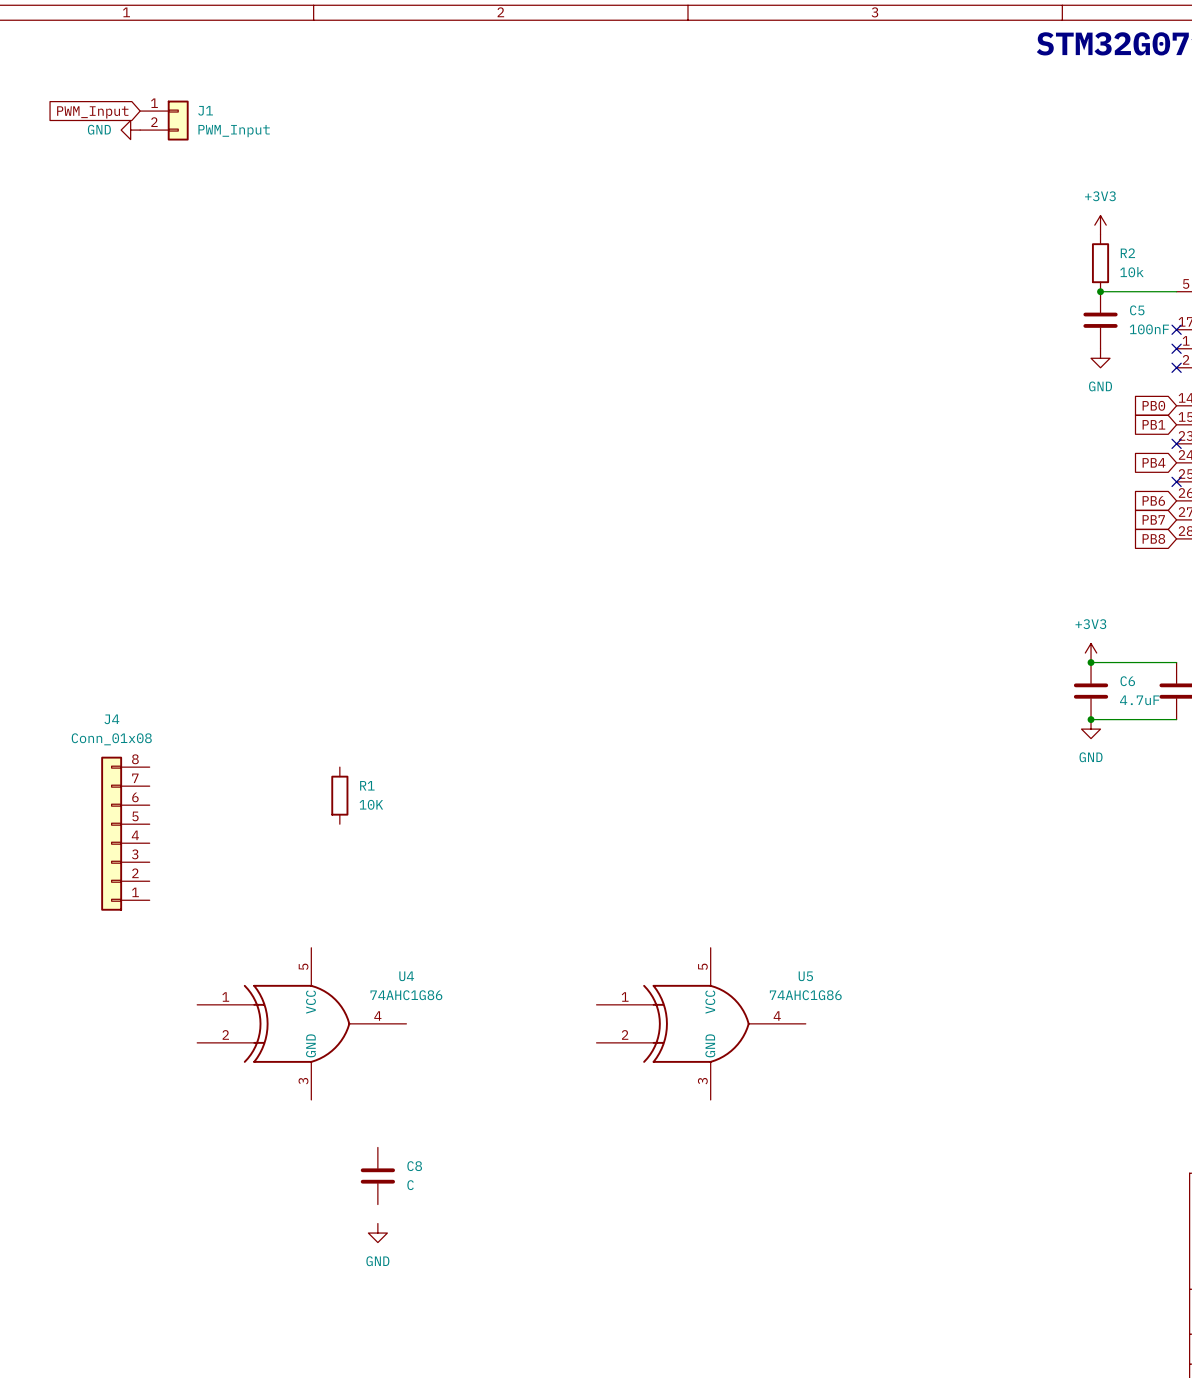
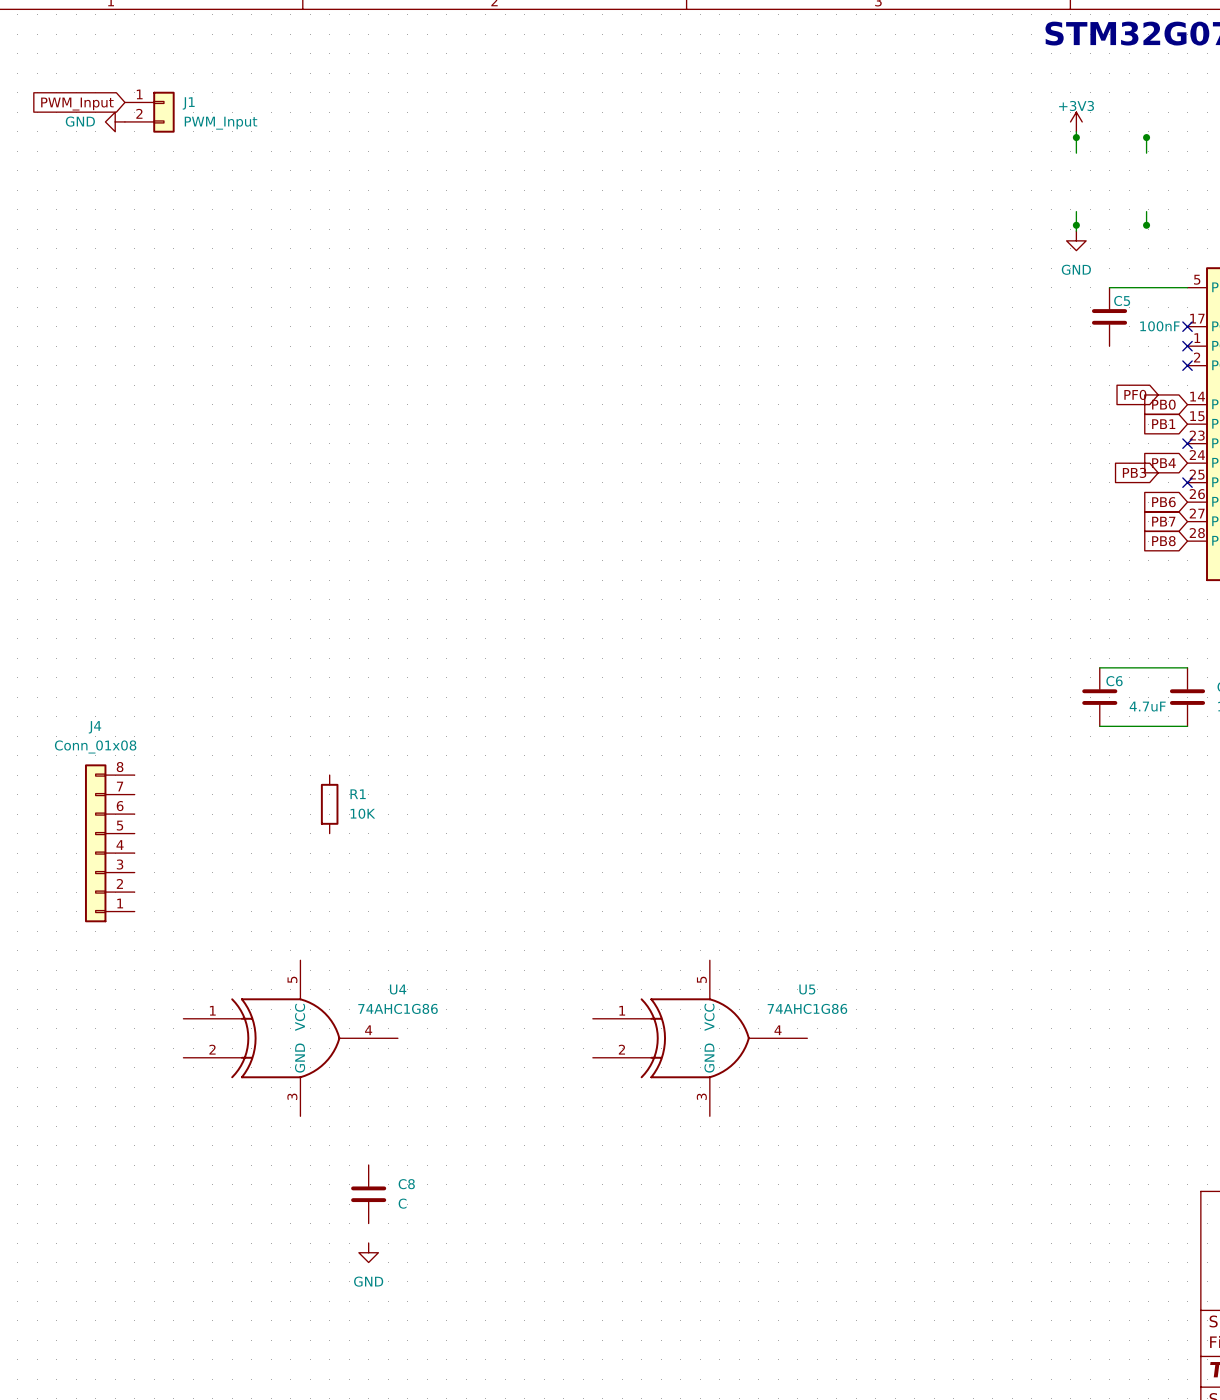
wire: none -> (1076, 131) (1076, 153)
junction: none -> (1076, 137)
wire: none -> (1146, 137) (1146, 153)
junction: none -> (1146, 137)
power symbol text position: +3V3 (1100, 196) -> +3V3 (1076, 106)
wire: none -> (1076, 211) (1076, 231)
wire: none -> (1146, 211) (1146, 225)
power symbol position: +3V3 (1100, 225) -> +3V3 (1076, 121)
junction: none -> (1076, 225)
junction: none -> (1146, 225)
R2: 10k (1100, 263) -> none
junction: (1100, 291) -> none
C5 name position: C5 (1137, 310) -> C5 (1122, 300)
power symbol position: GND (1100, 358) -> GND (1076, 240)
global label: none -> PF0 (1135, 394)
global label: none -> PB3 (1134, 472)
power symbol: +3V3 (1091, 653) -> none
junction: (1091, 662) -> none
C6 name position: C6 (1127, 681) -> C6 (1114, 681)
junction: (1091, 719) -> none
power symbol: GND (1091, 729) -> none

